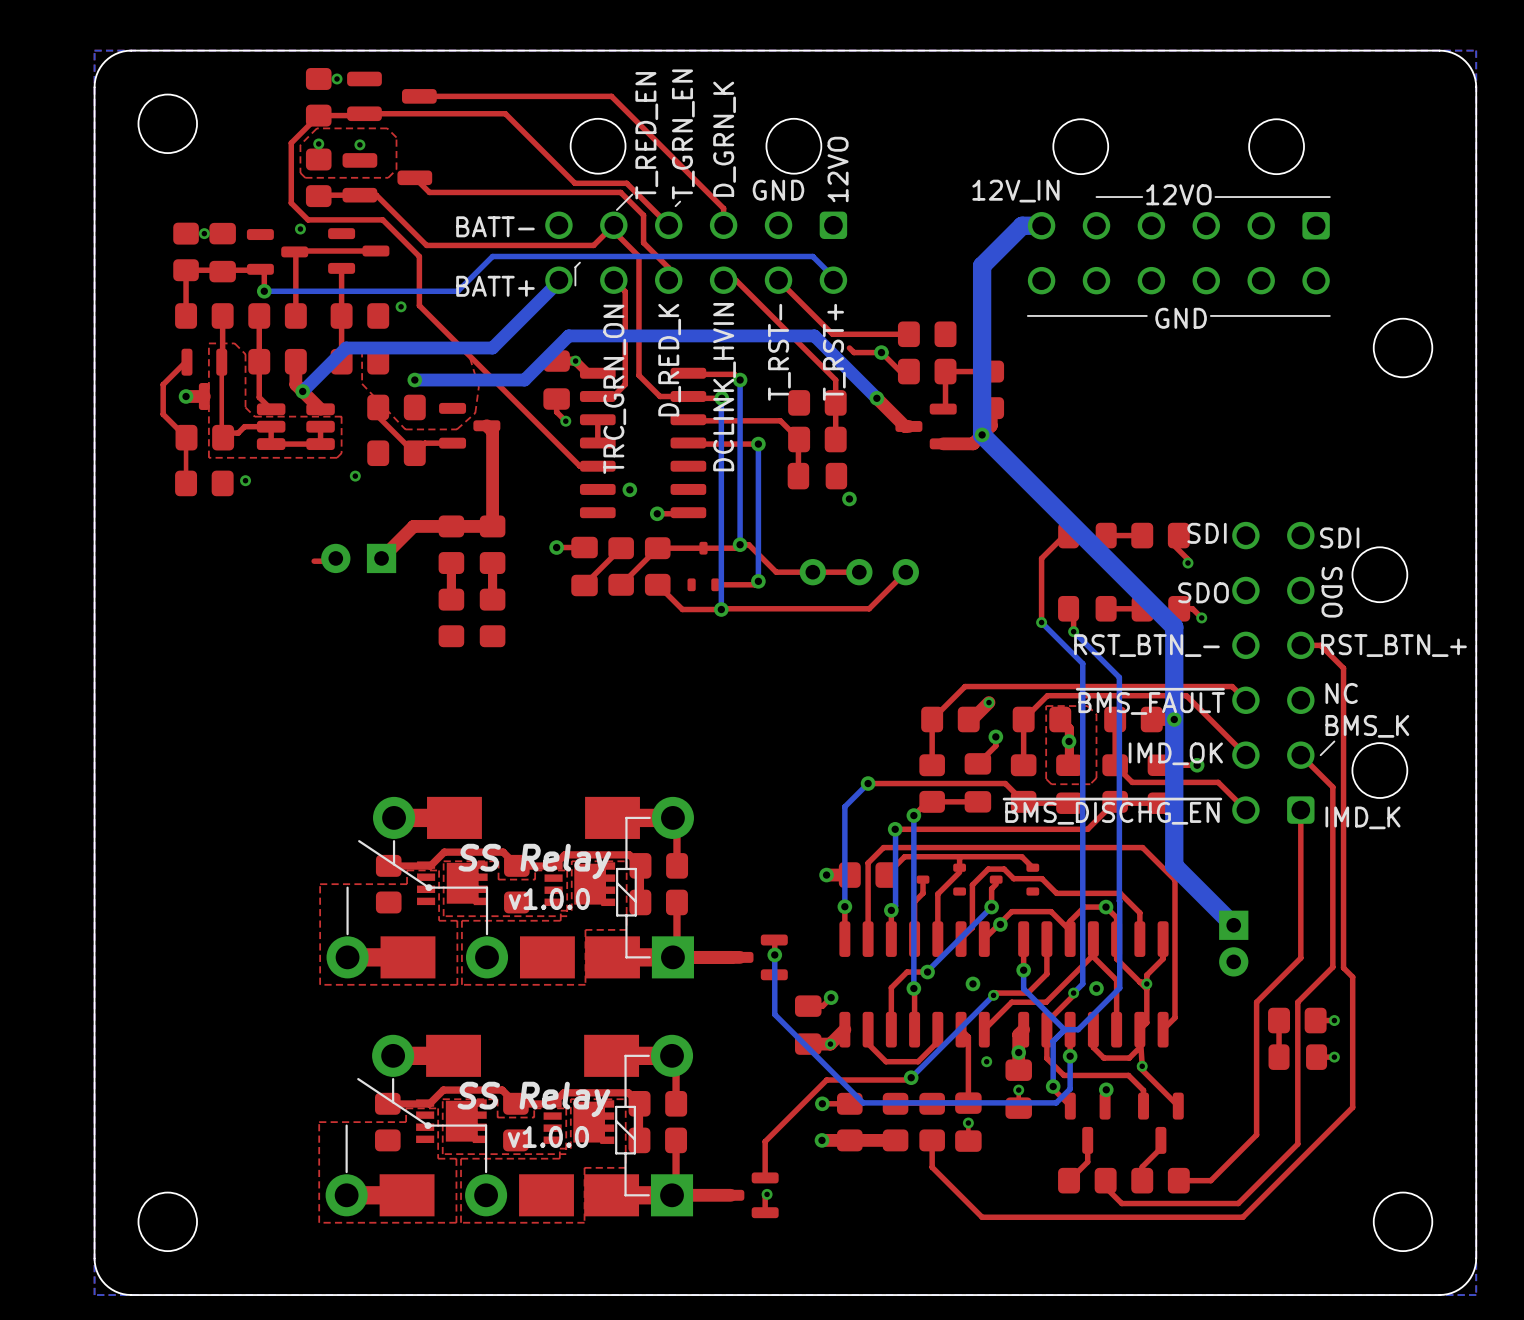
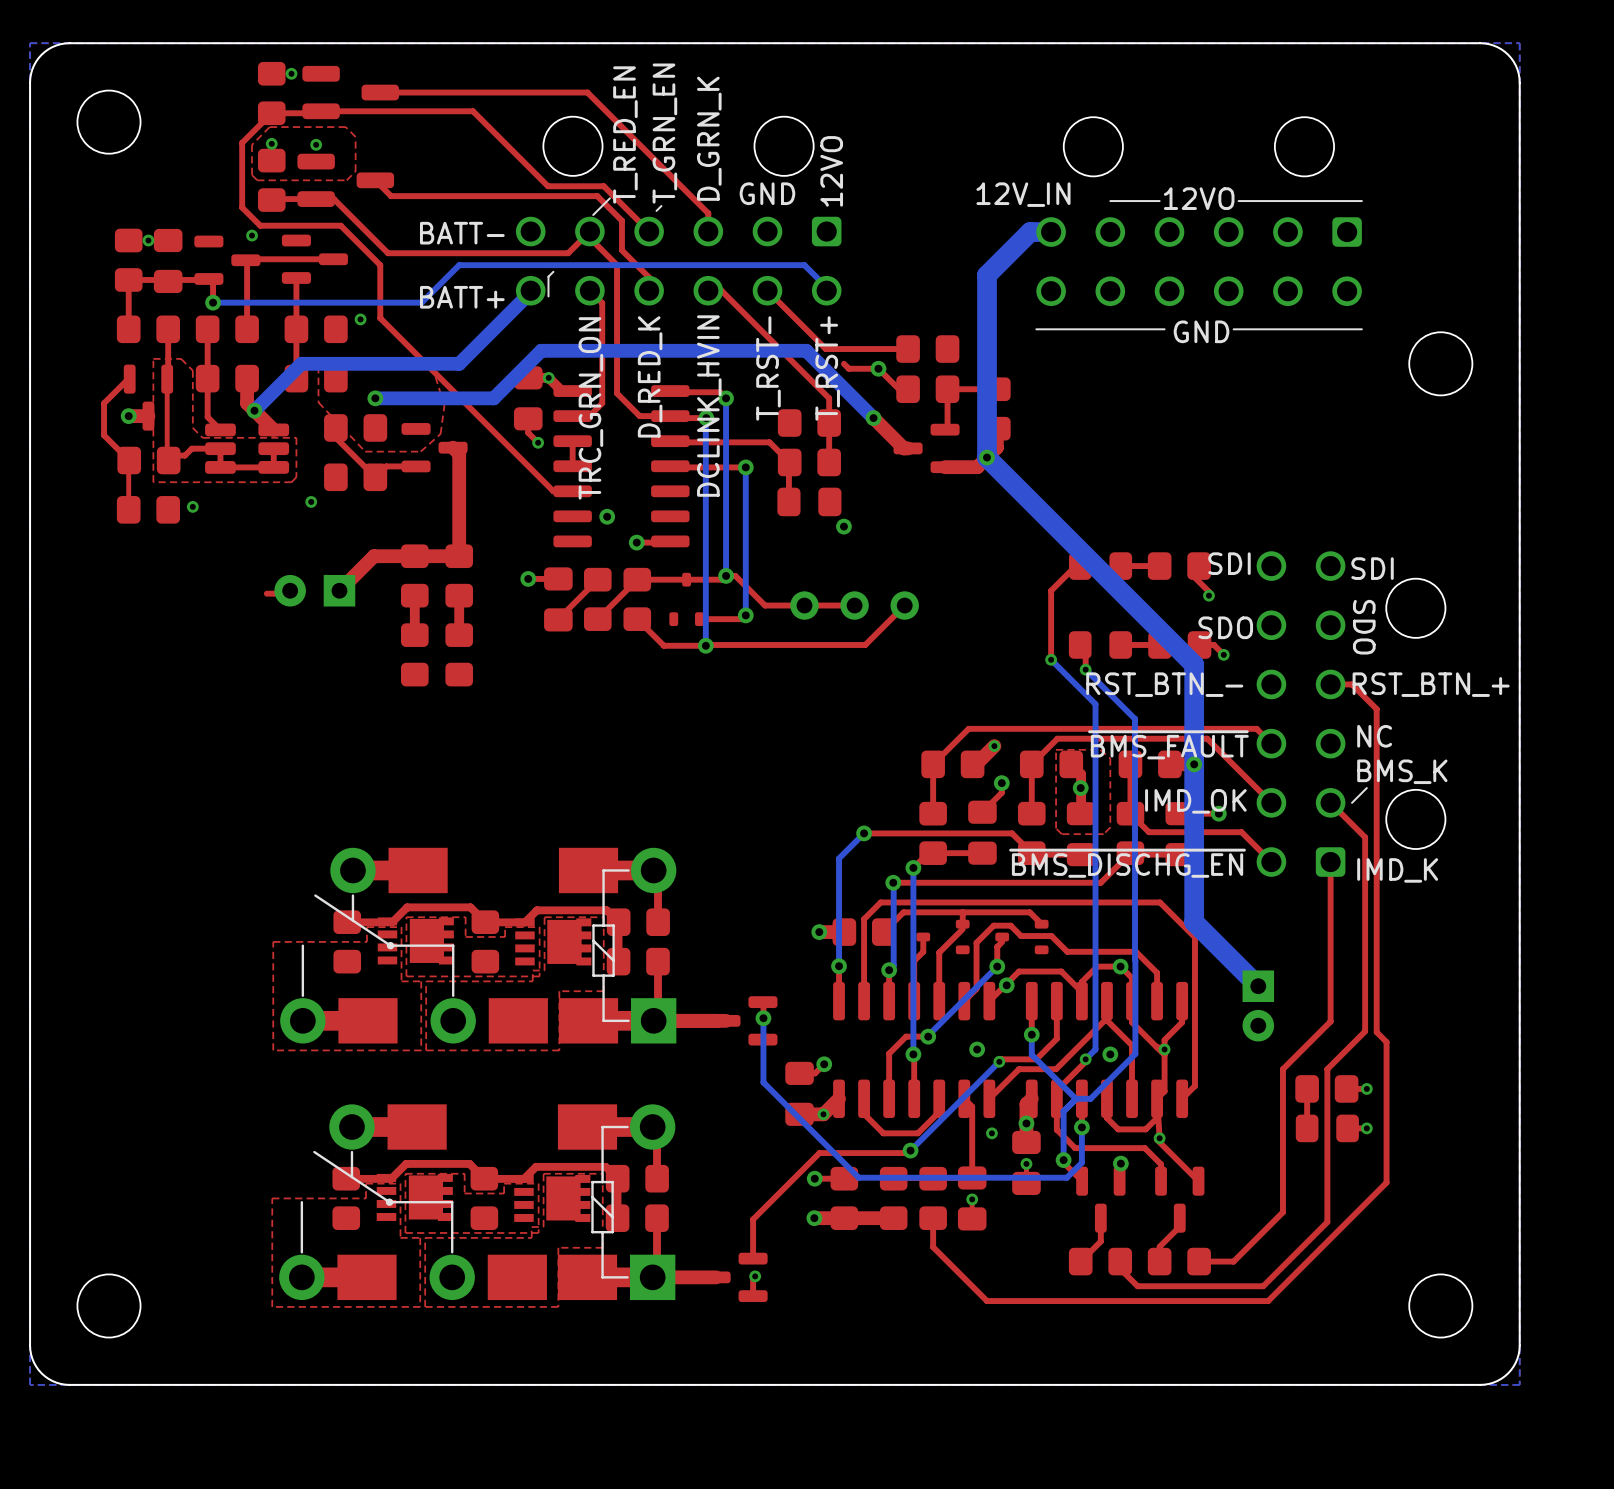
text: SS Relay (534, 861) -> none
text: v1.0.0 (549, 899) -> none
text: SS Relay (533, 1099) -> none
text: v1.0.0 (548, 1136) -> none

